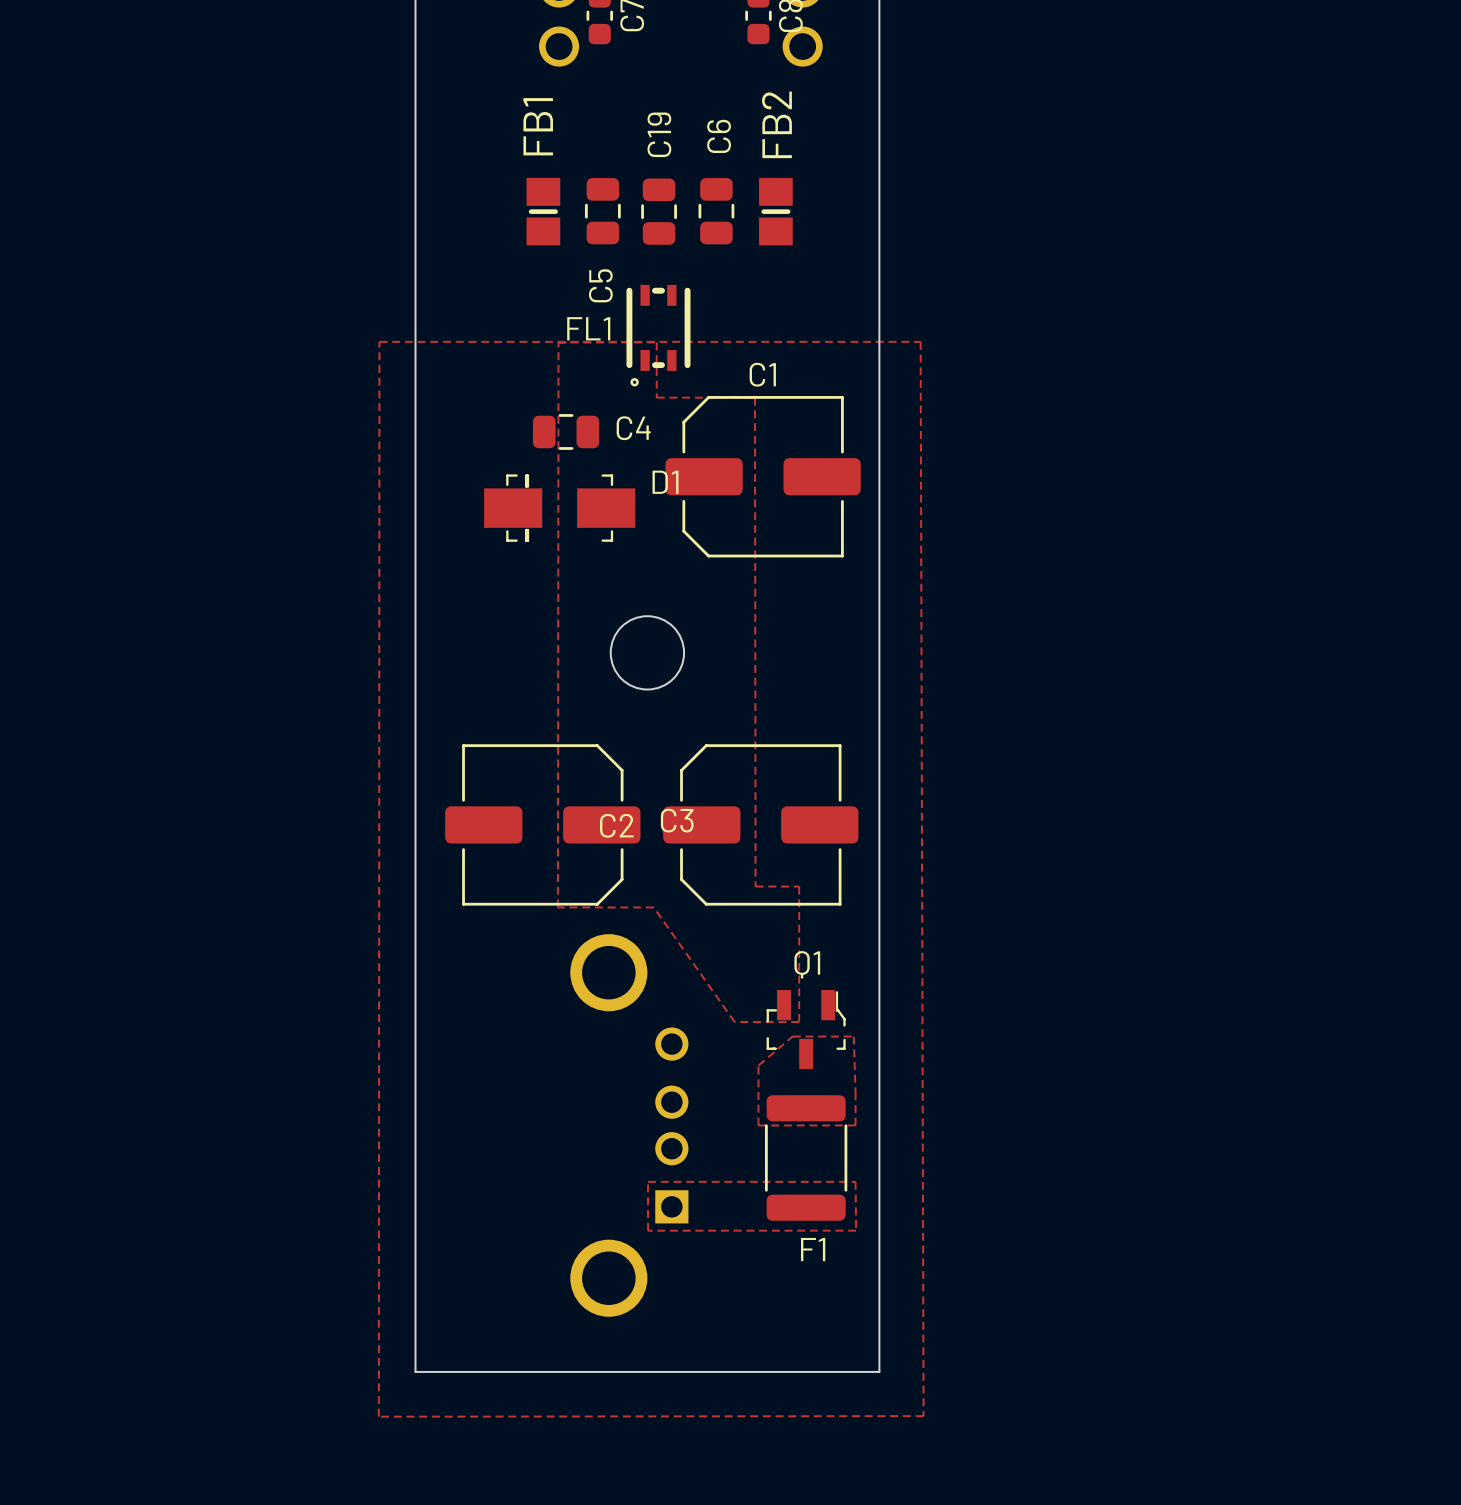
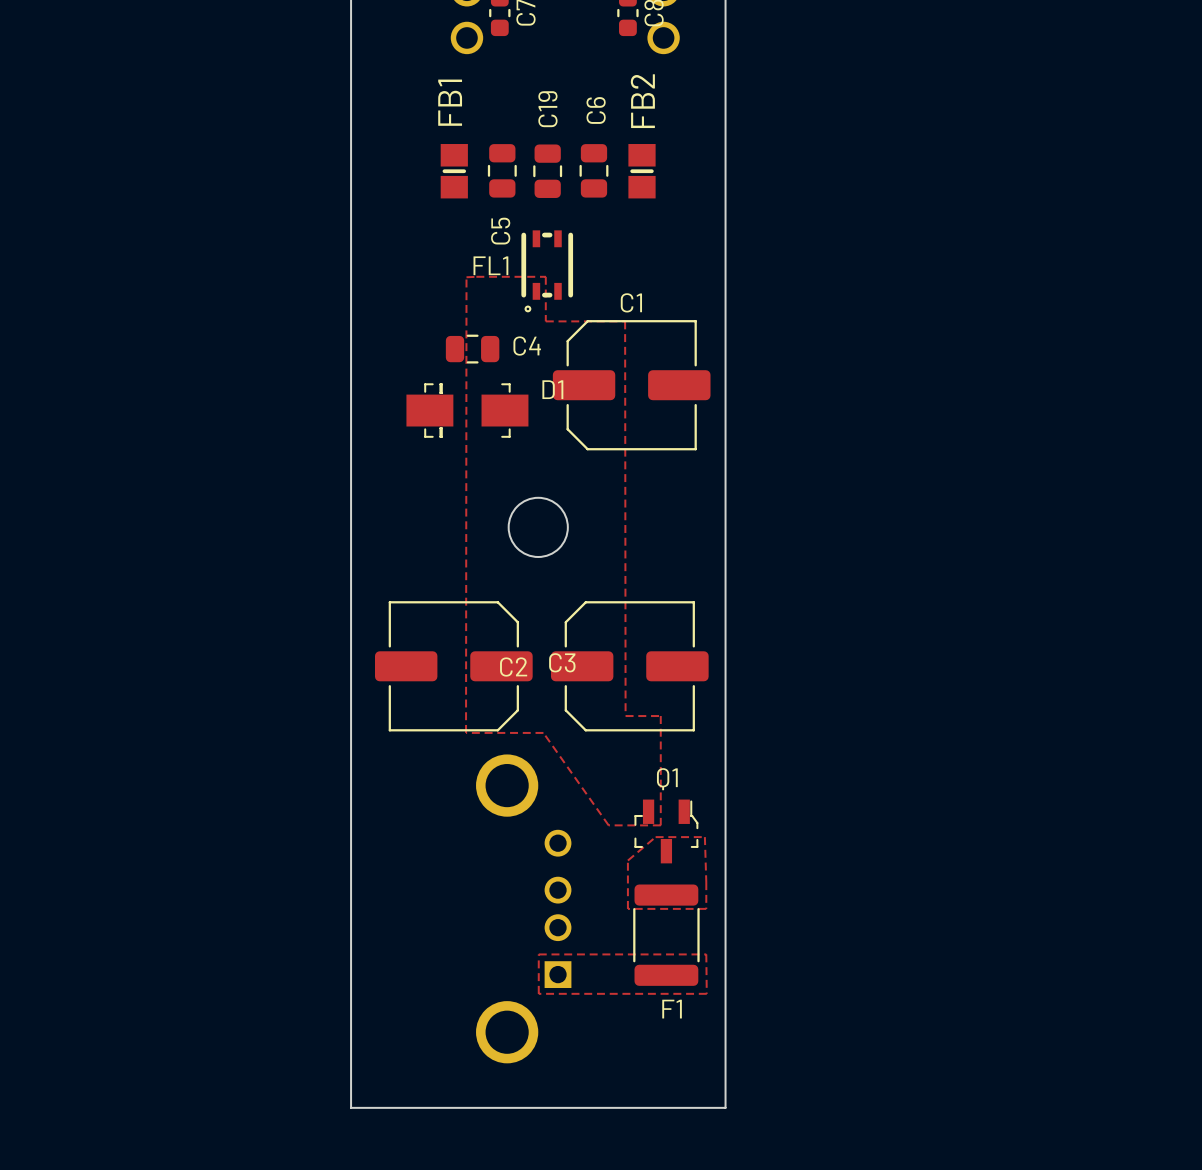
zone outline: (379, 341) (378, 1416) (923, 1416) (920, 341) (379, 341) -> none

